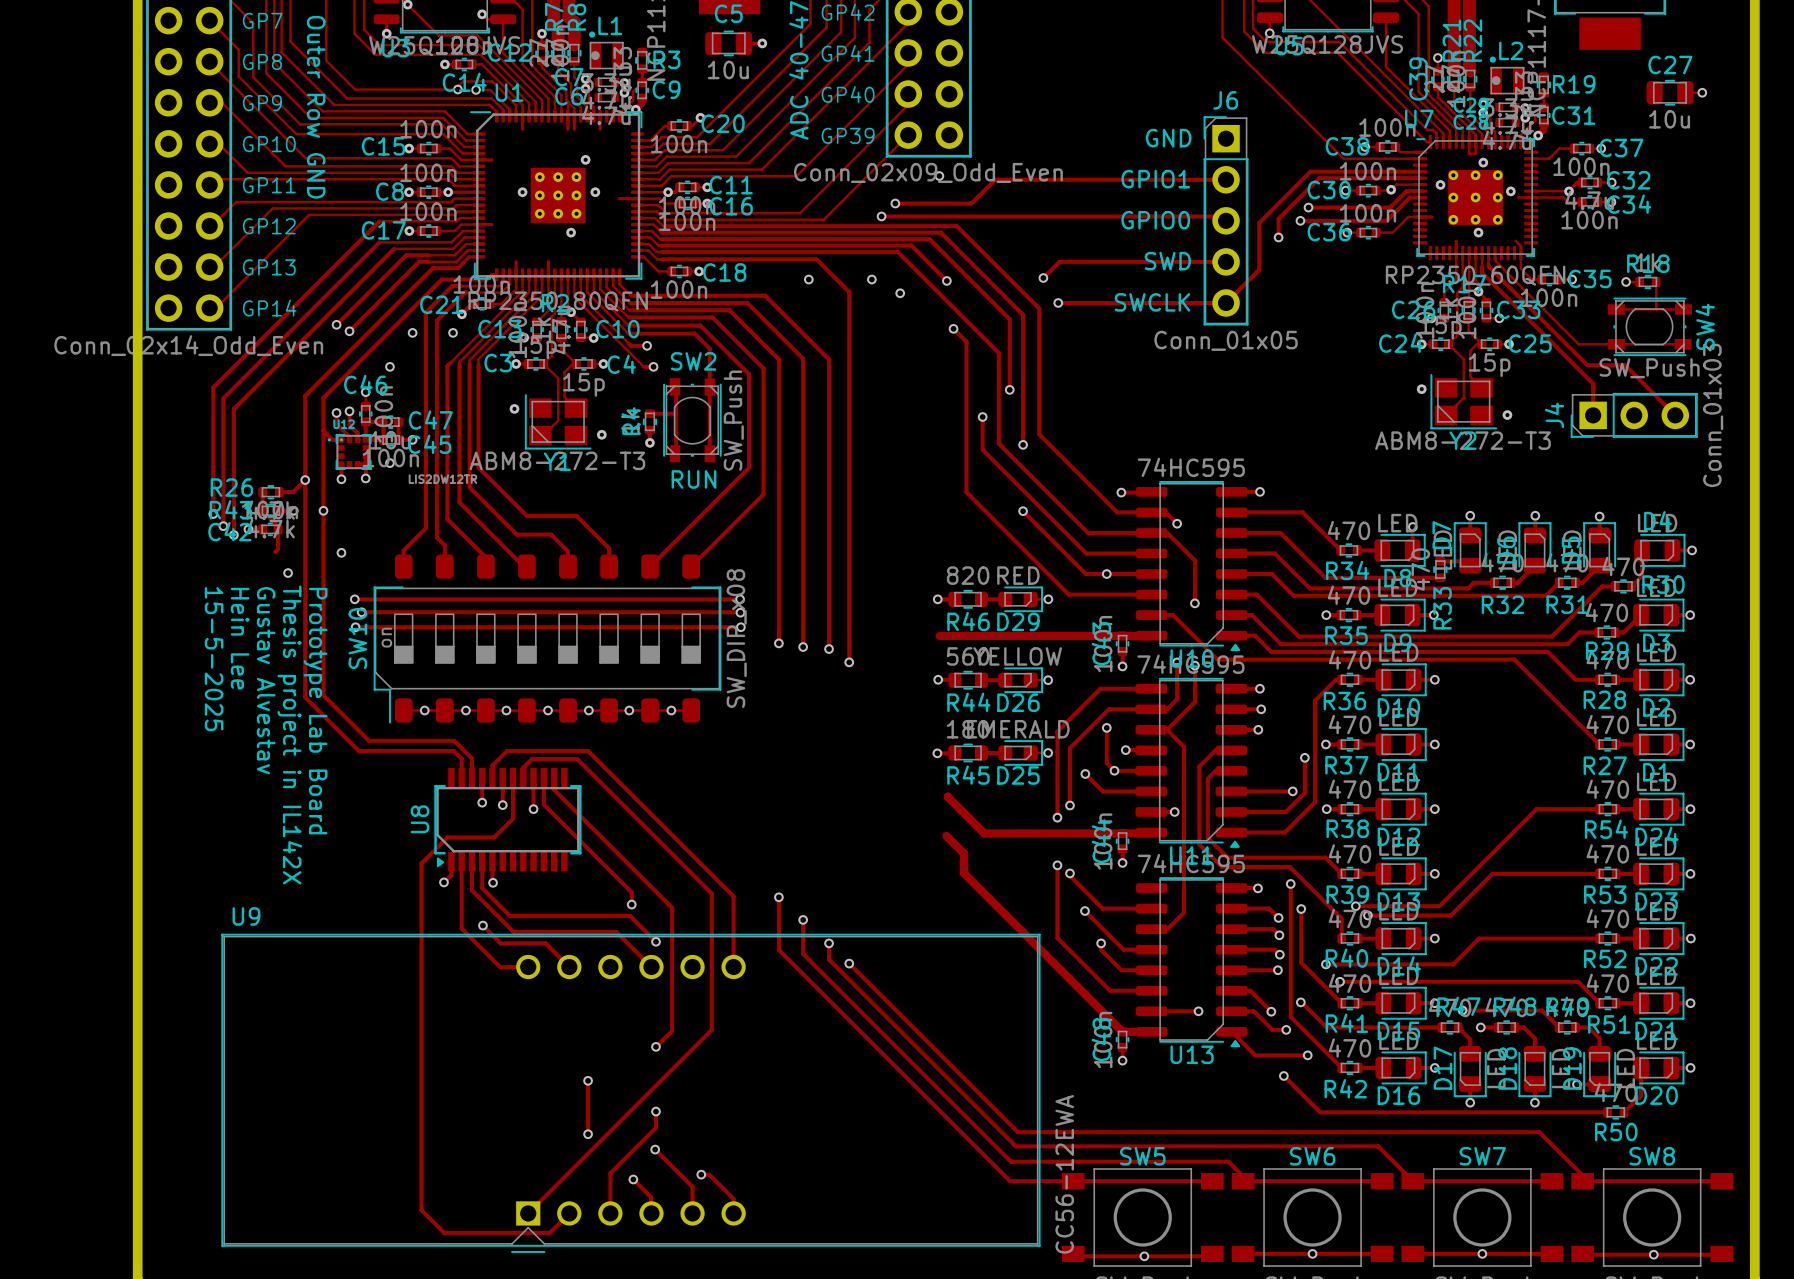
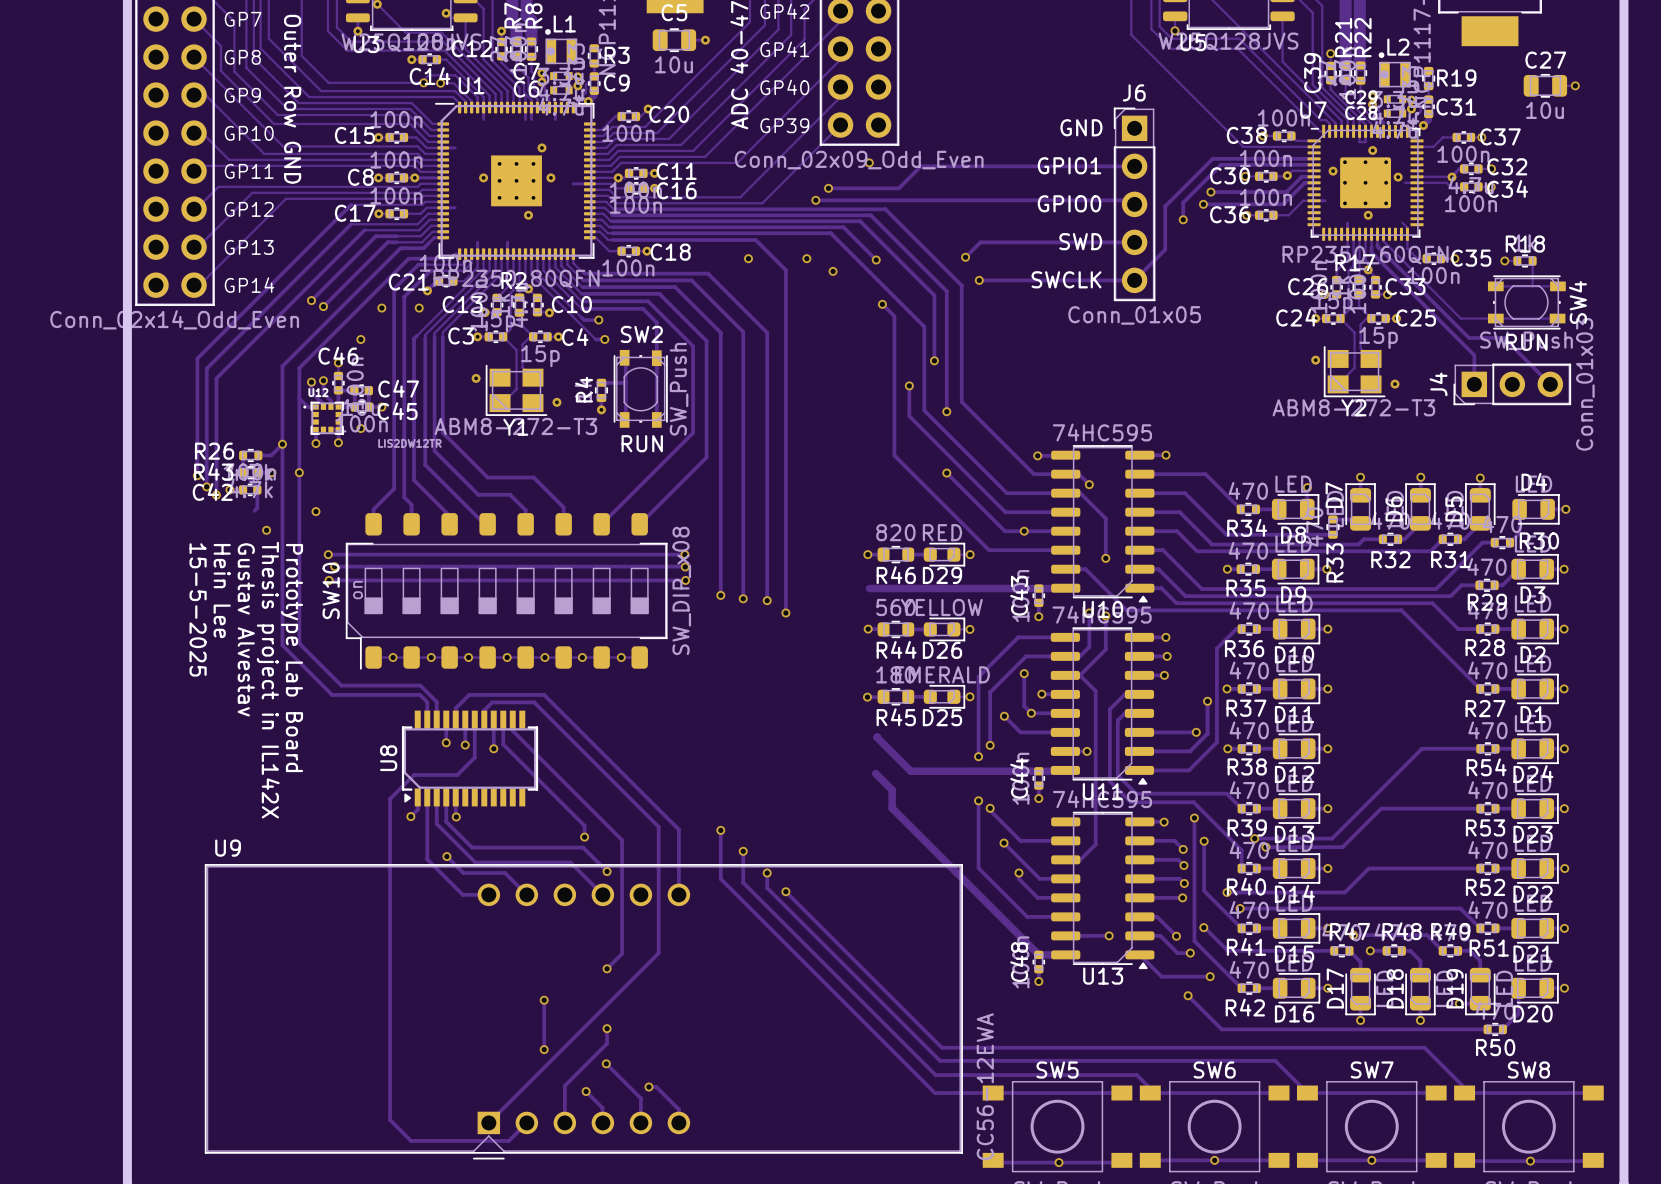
text: none -> RUN (1526, 342)

